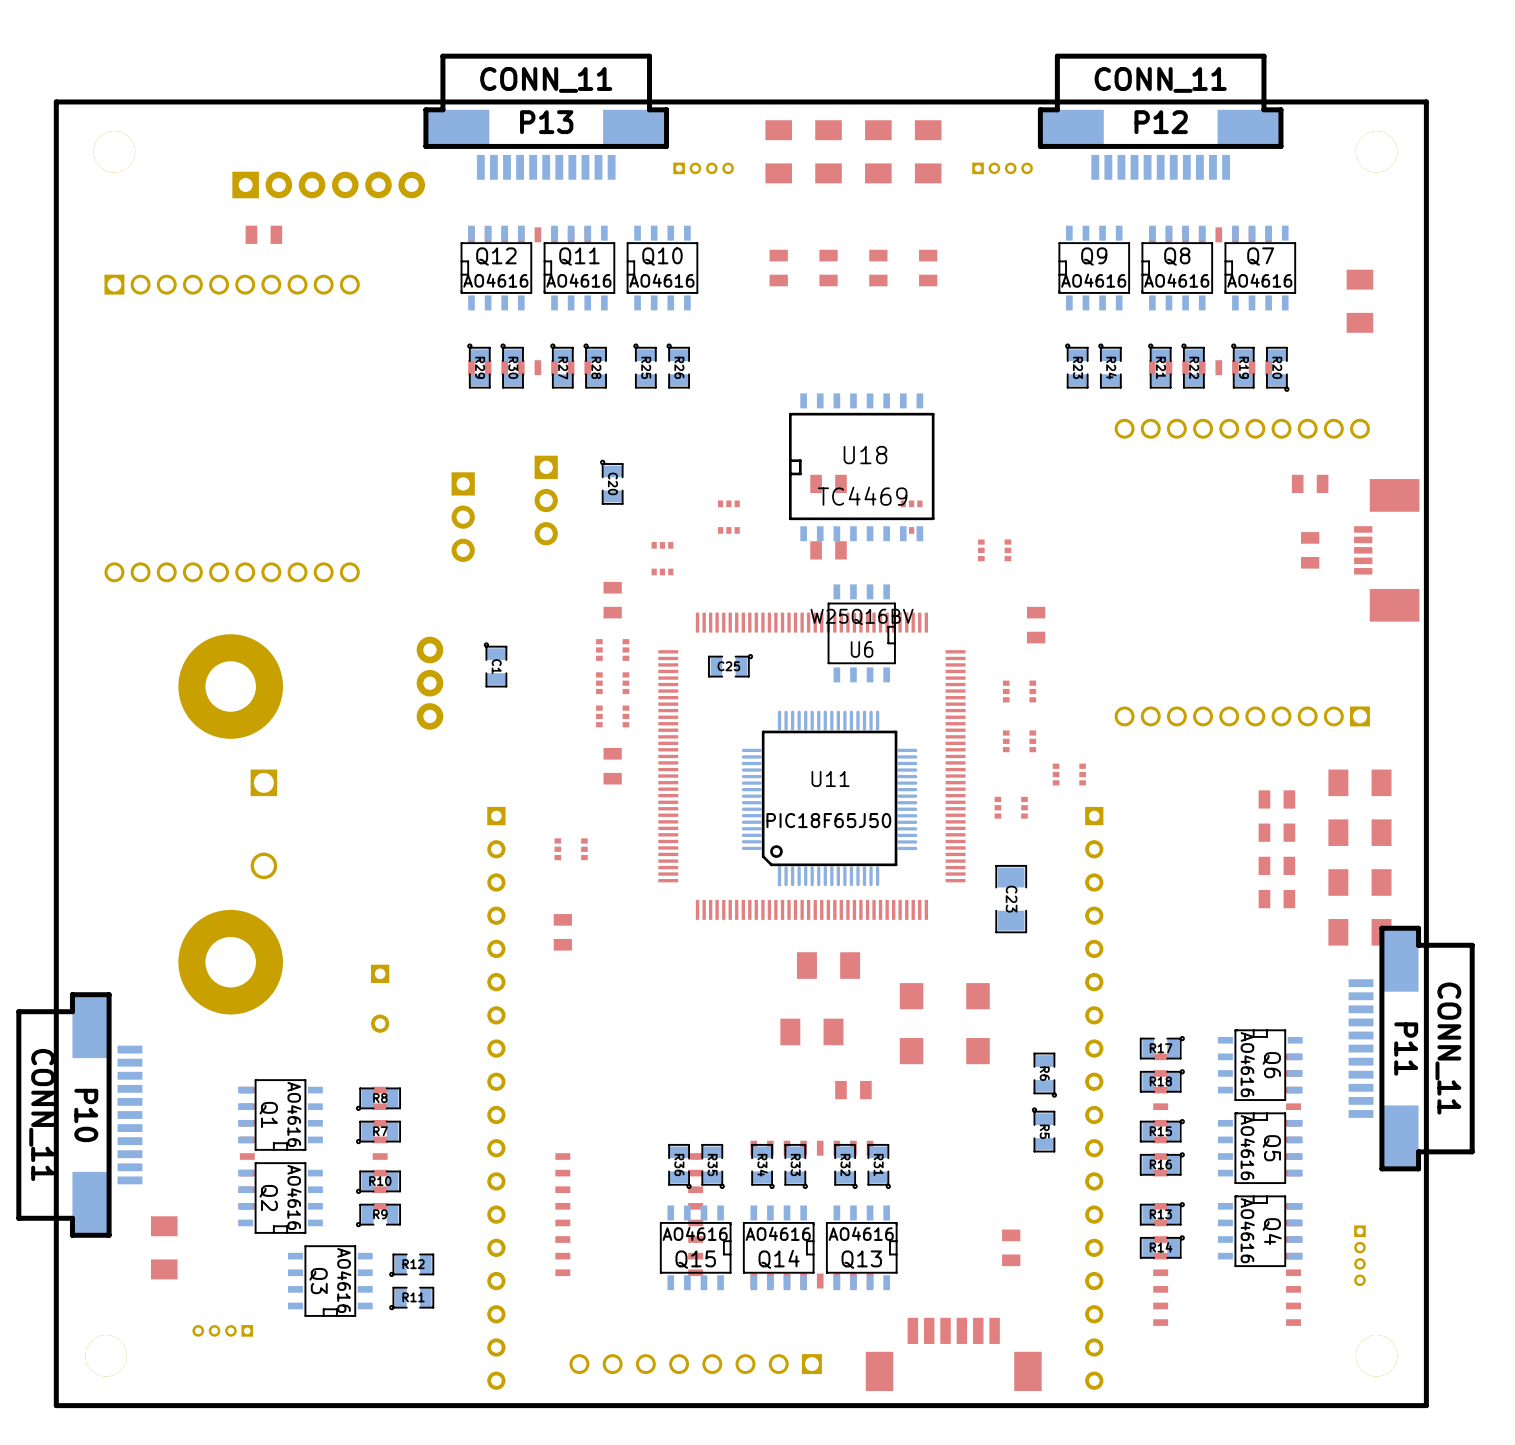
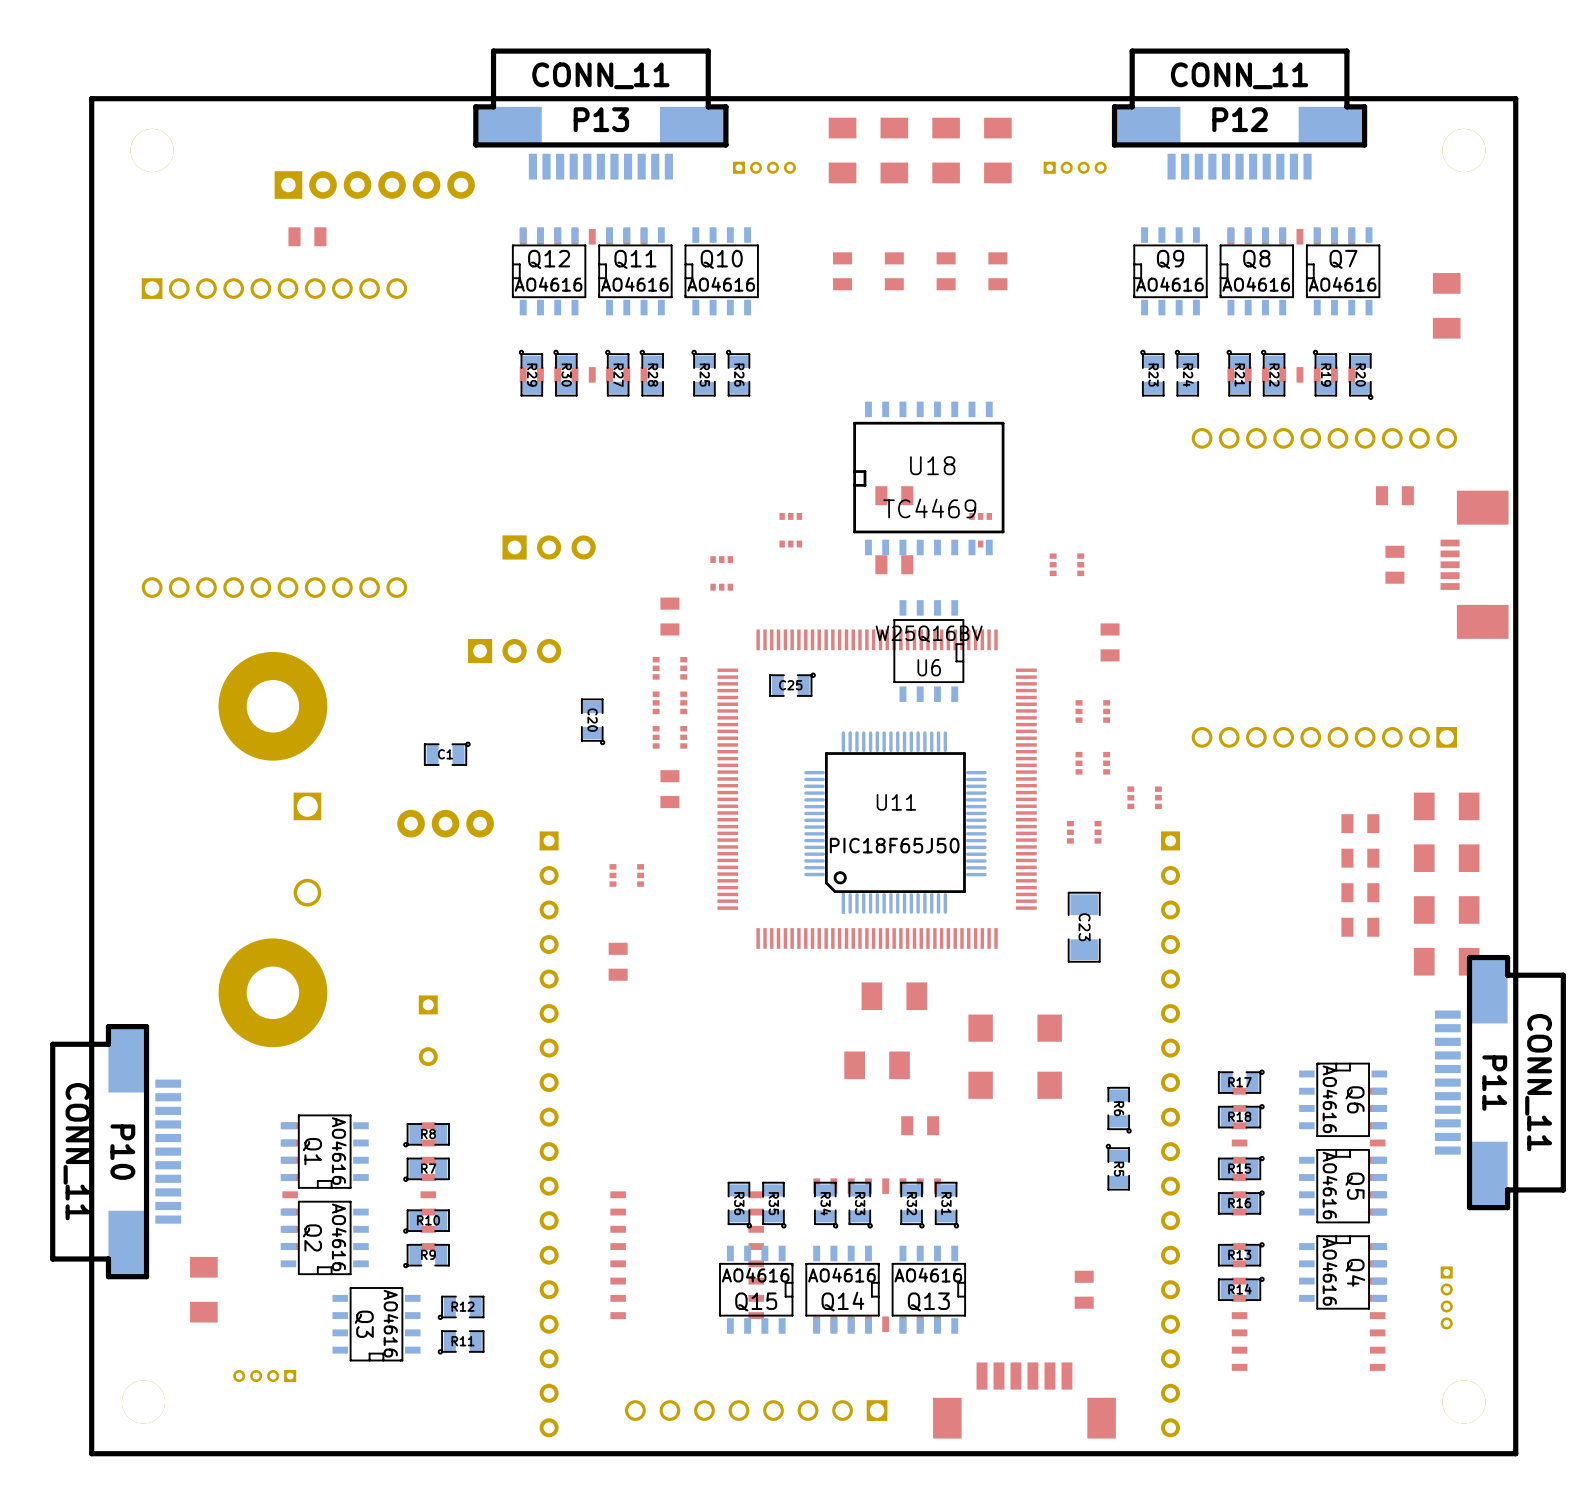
C20 rotation: 0° (611, 482) -> 180° (593, 721)
C20 position: (611, 482) -> (593, 721)
part: (546, 500) -> none
part: (463, 517) -> none
part: none -> (549, 547)
part: none -> (514, 651)
C1 rotation: 0° (495, 664) -> 90° clockwise (447, 753)
C1 position: (495, 664) -> (447, 753)
part rotation: 0° (429, 683) -> 90° clockwise (445, 823)
part position: (429, 683) -> (445, 823)

